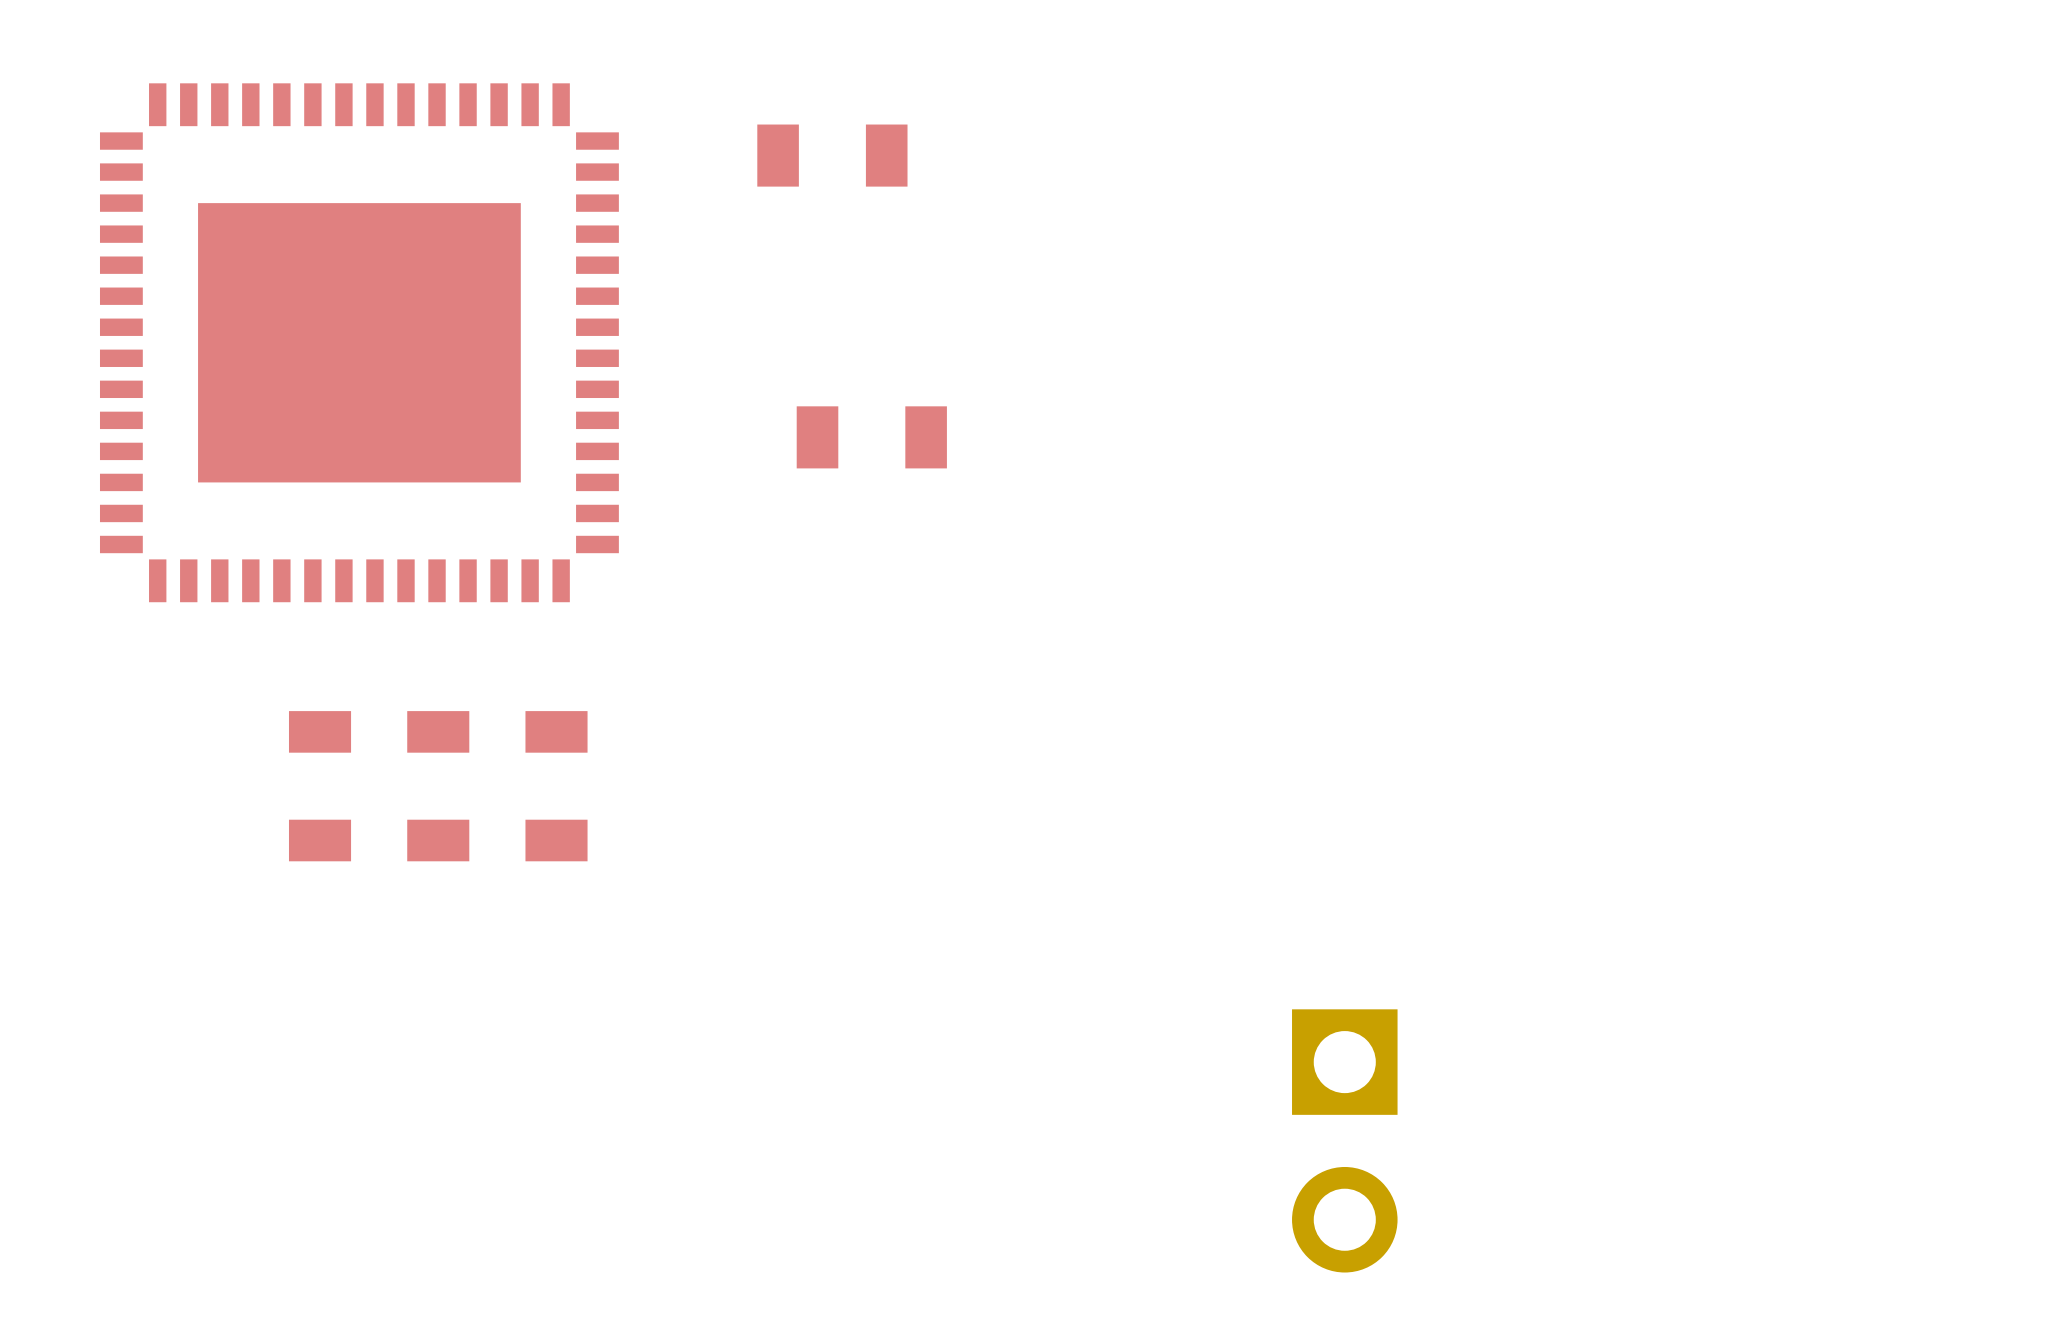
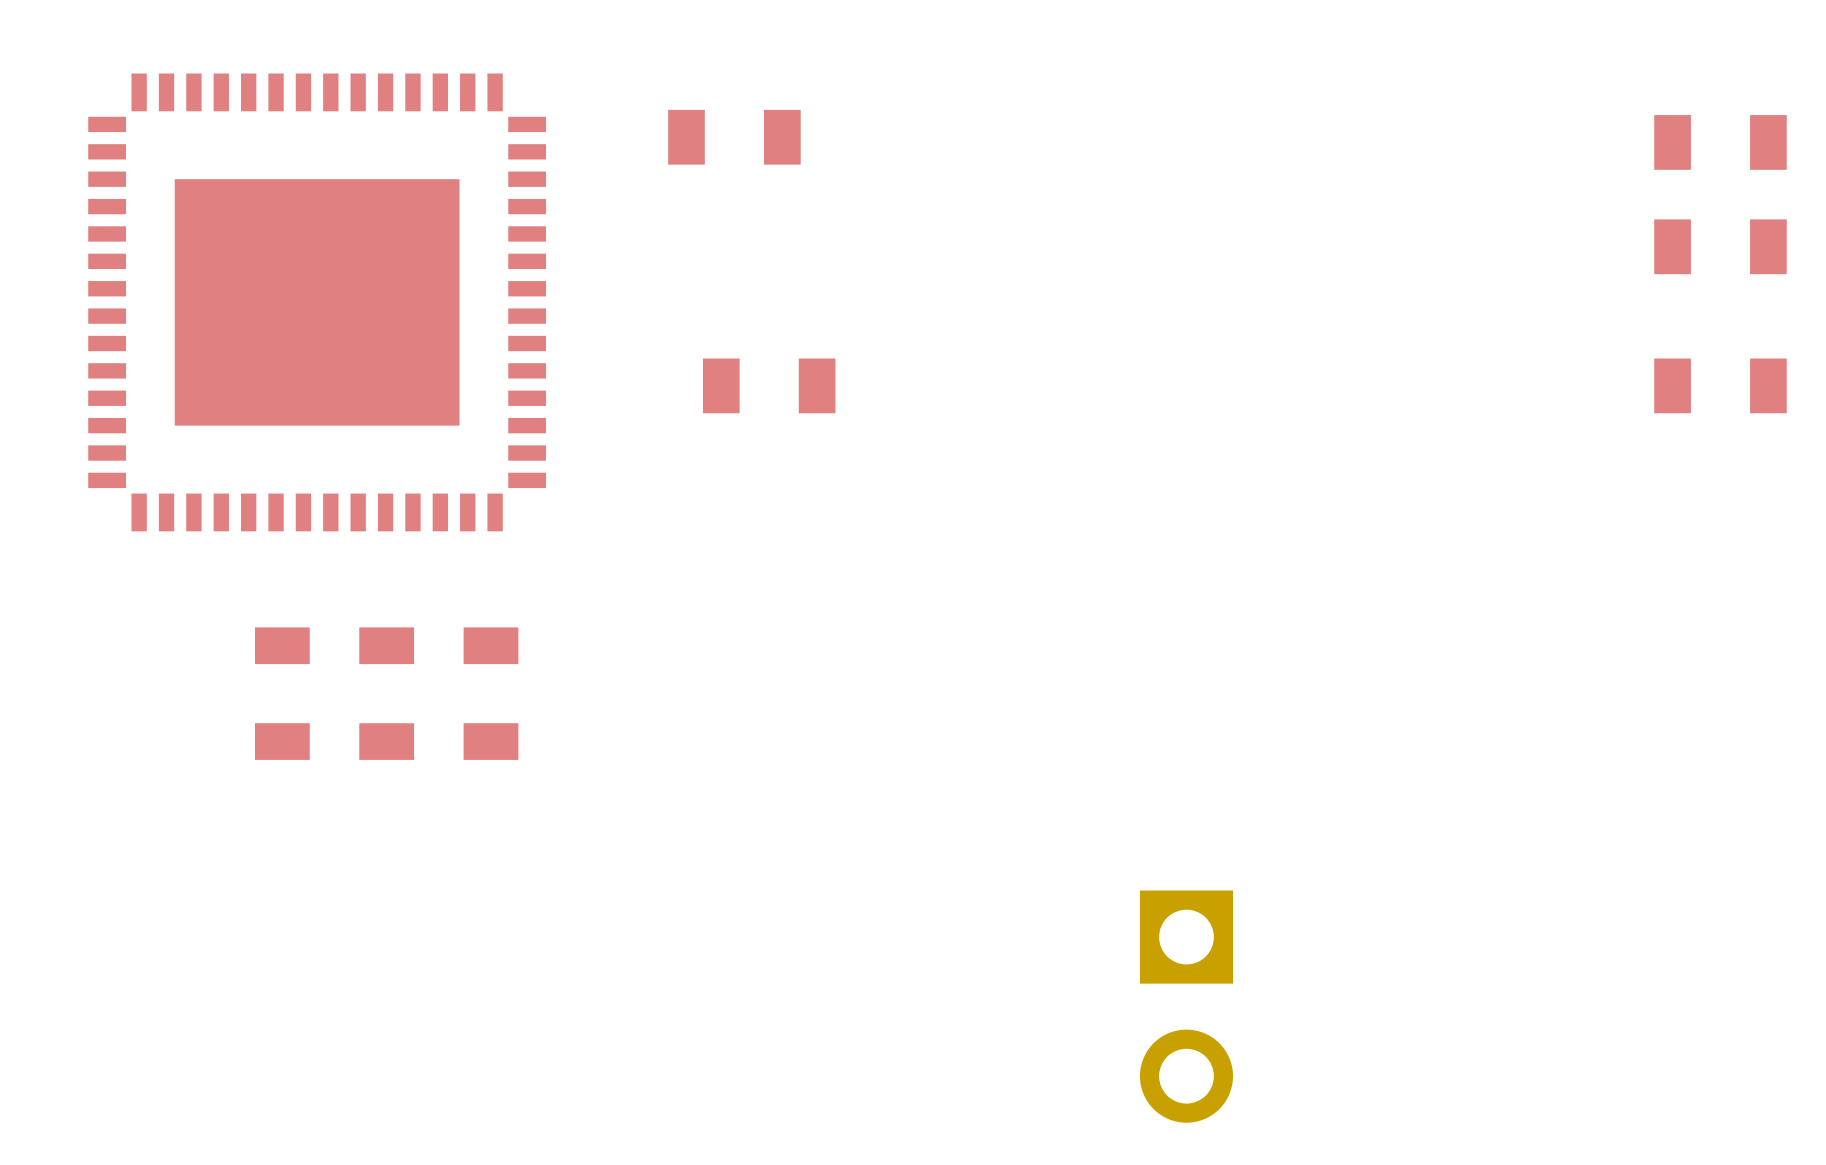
part: none -> (1720, 142)
part: none -> (1720, 246)
part: none -> (1720, 385)

